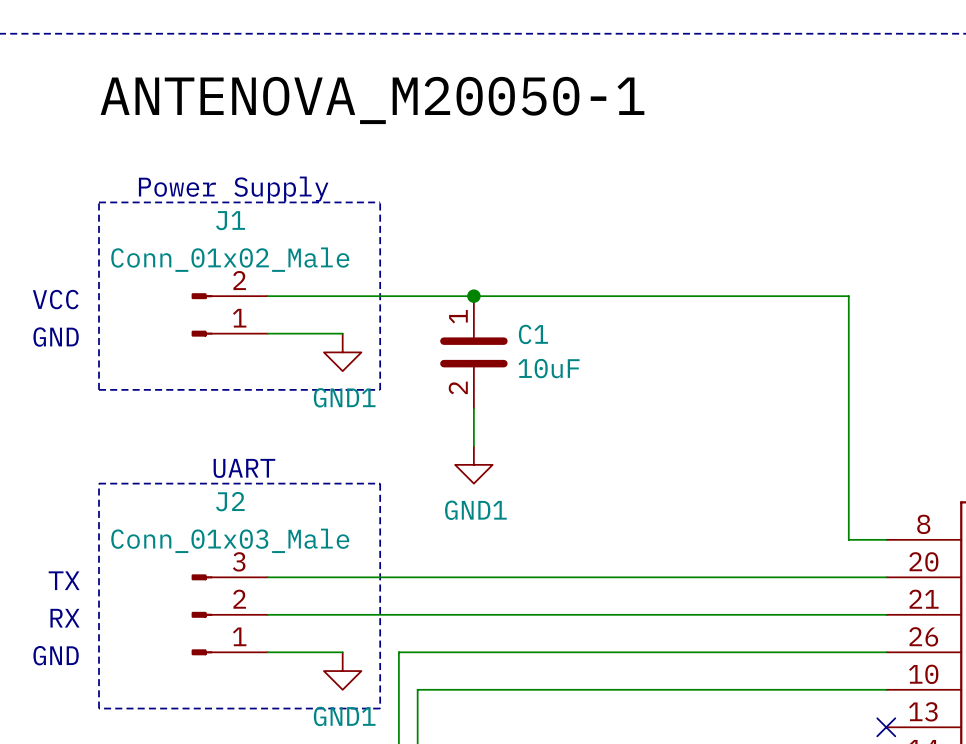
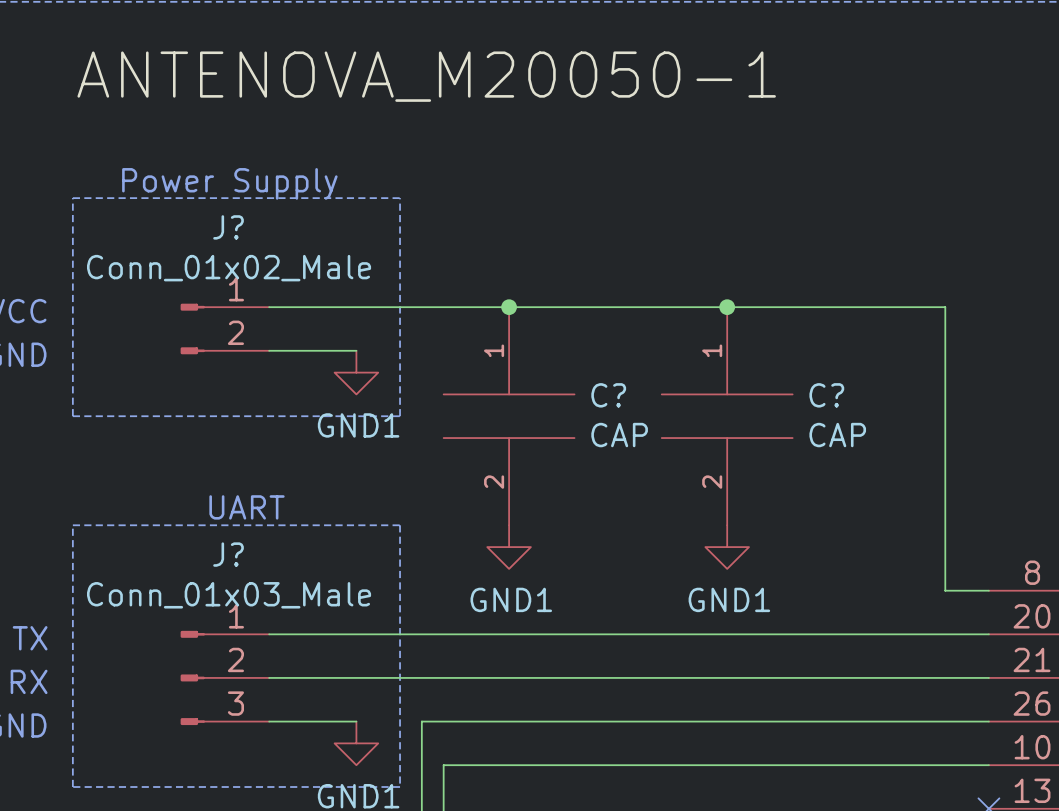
J1 name: J1 (230, 220) -> J? (228, 227)
junction: none -> (727, 307)
J1 flip: as is (202, 314) -> up-down (192, 328)
C1: 10uF (473, 352) -> none
C?: none -> CAP (509, 416)
C?: none -> CAP (727, 416)
power symbol position: GND1 (473, 464) -> GND1 (509, 547)
J2 name: J2 (230, 501) -> J? (228, 554)
power symbol: none -> GND1 (727, 547)
J2 flip: as is (202, 614) -> up-down (192, 677)

